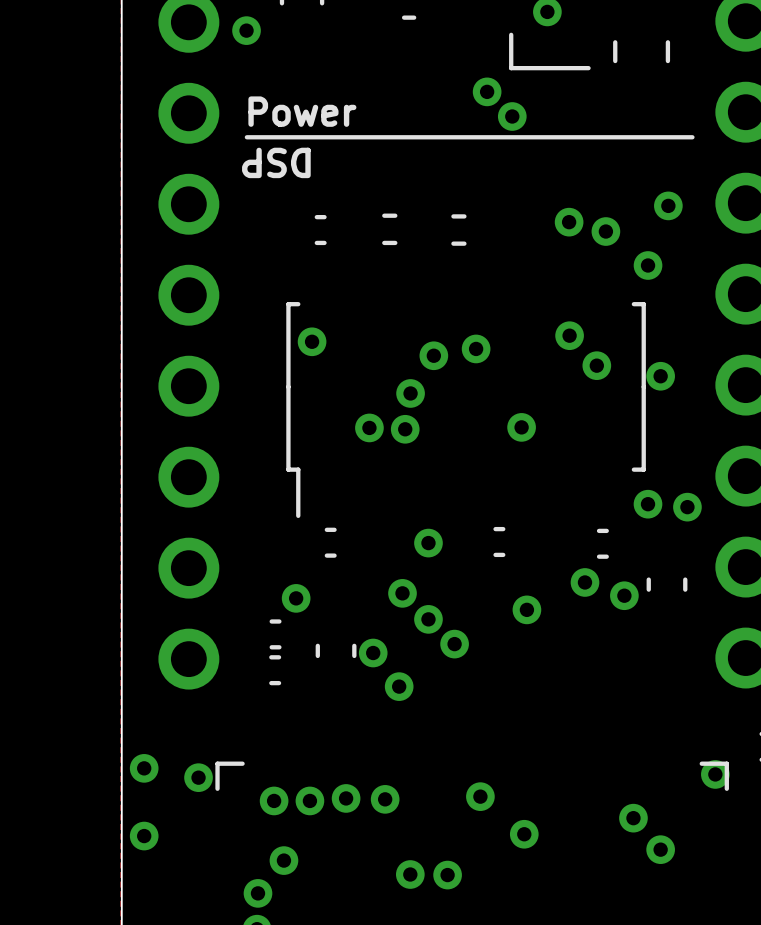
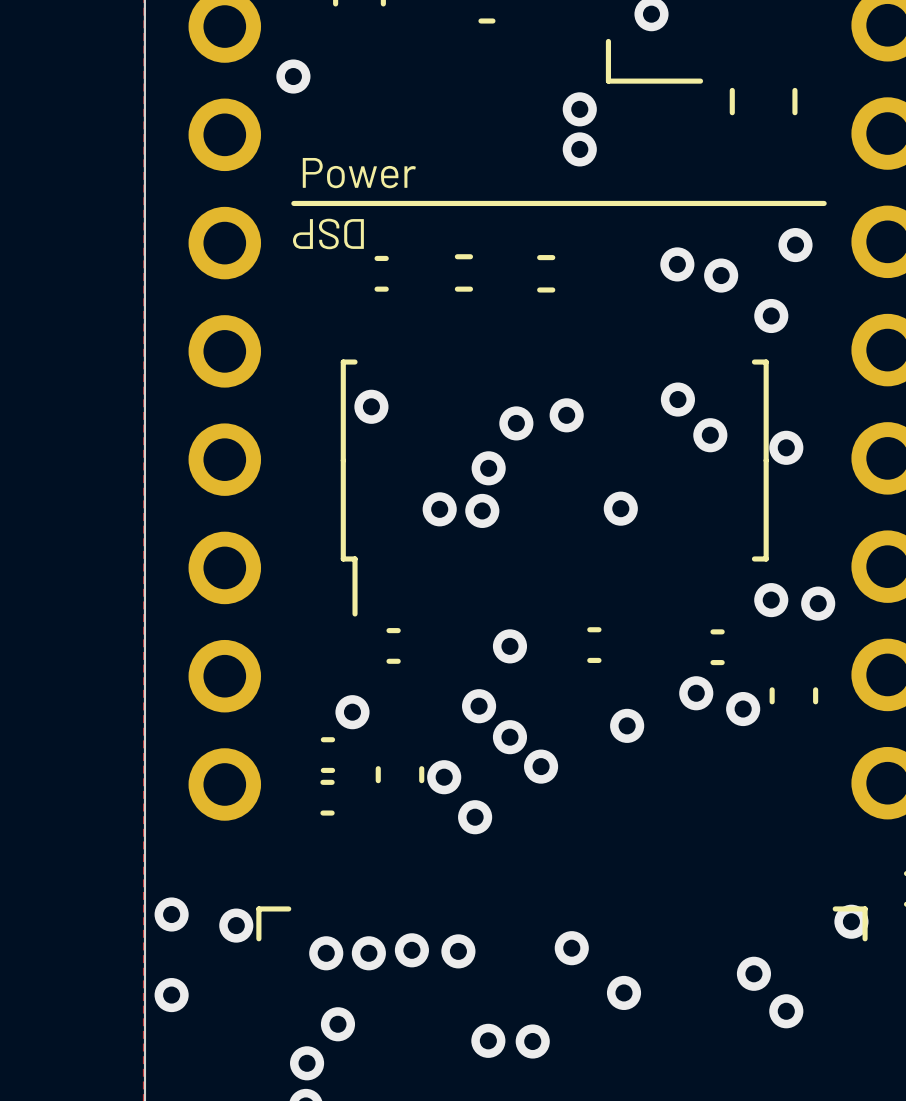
via position: (246, 30) -> (293, 76)
part position: (641, 51) -> (763, 101)
text position: Power (302, 111) -> Power (359, 173)
via position: (512, 116) -> (579, 149)
line: (246, 137) (692, 137) -> (293, 203) (824, 203)
text position: DSP (276, 162) -> DSP (328, 233)

